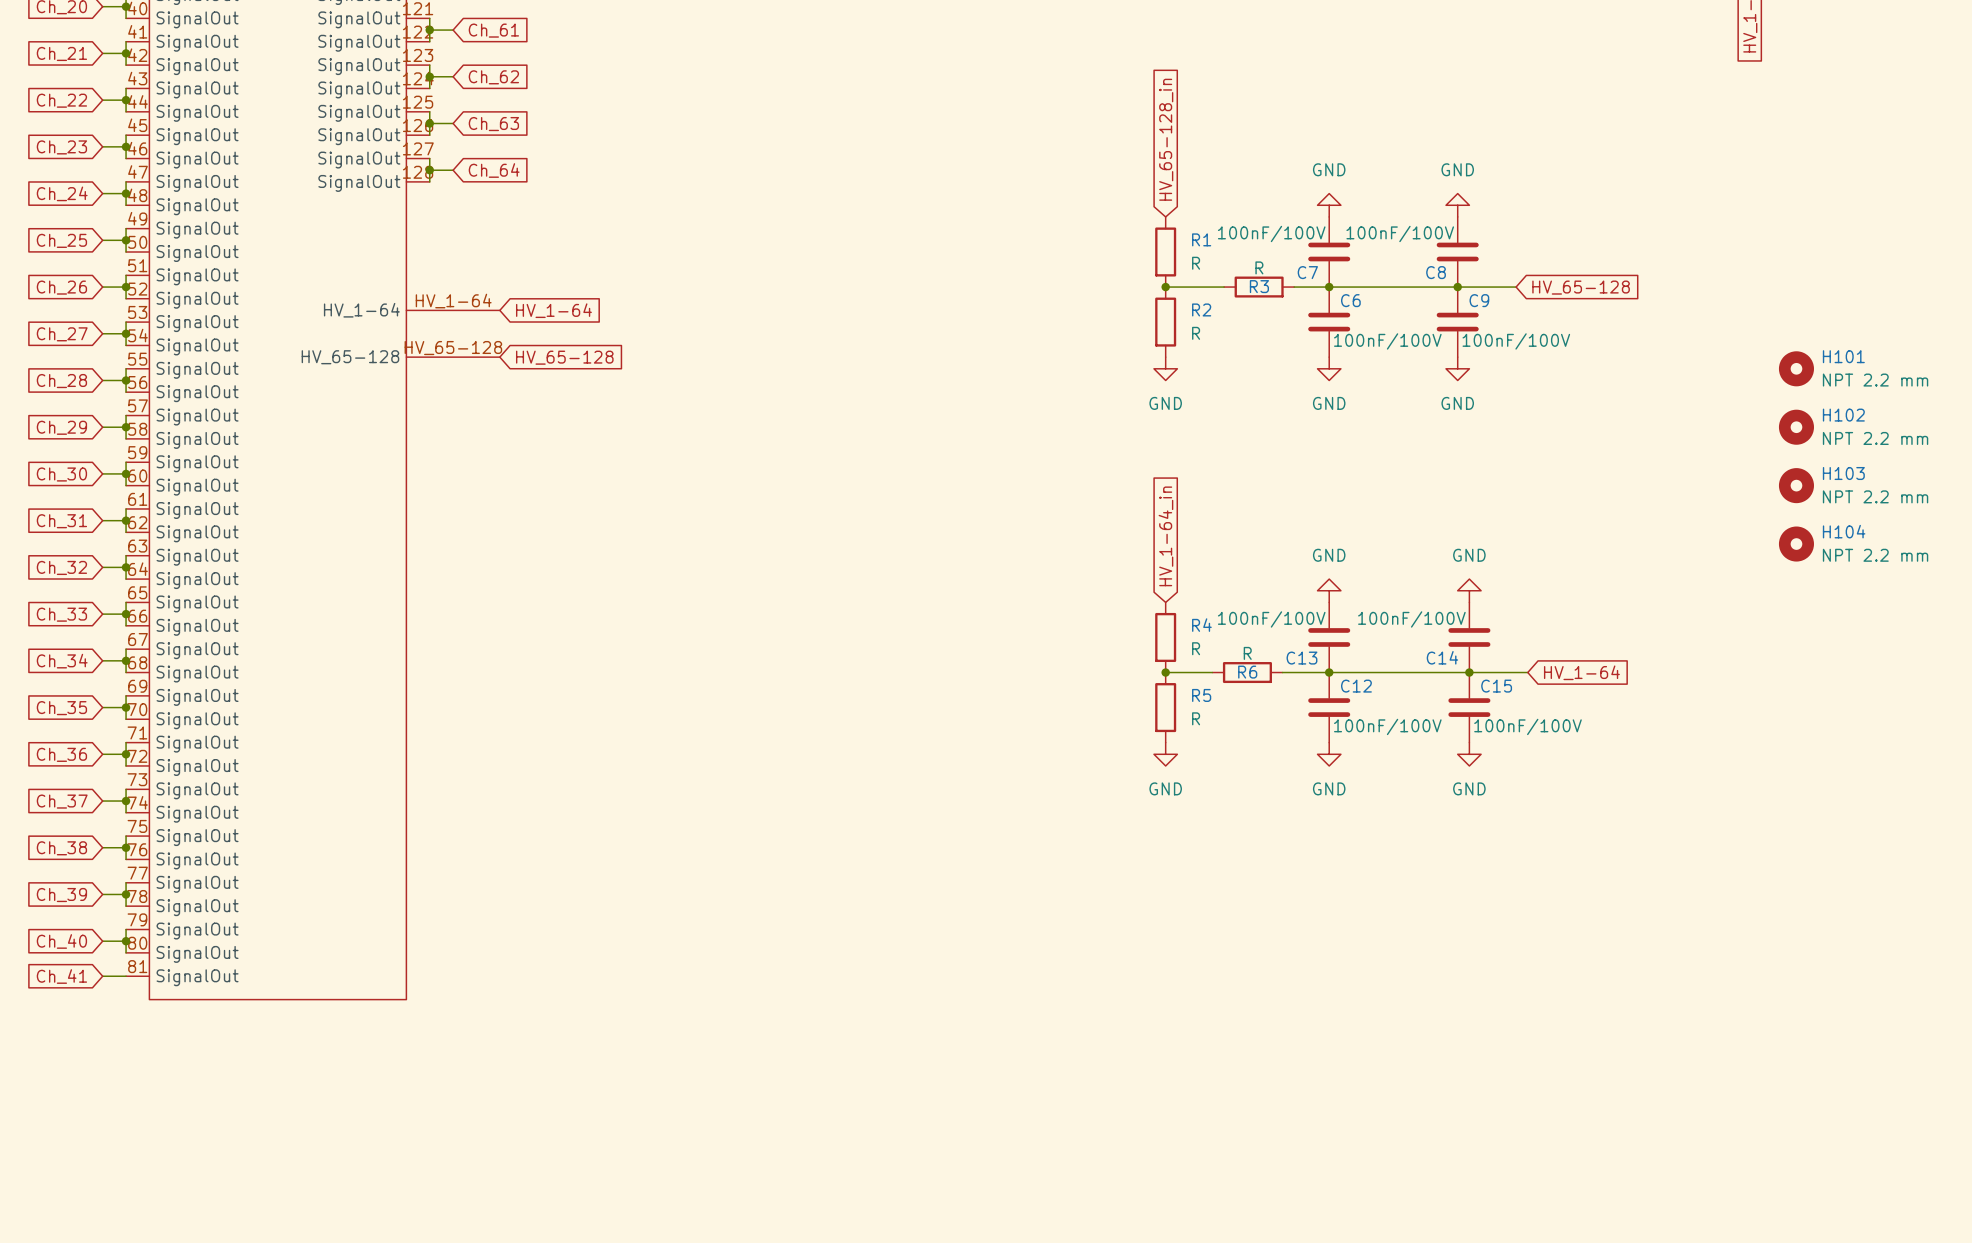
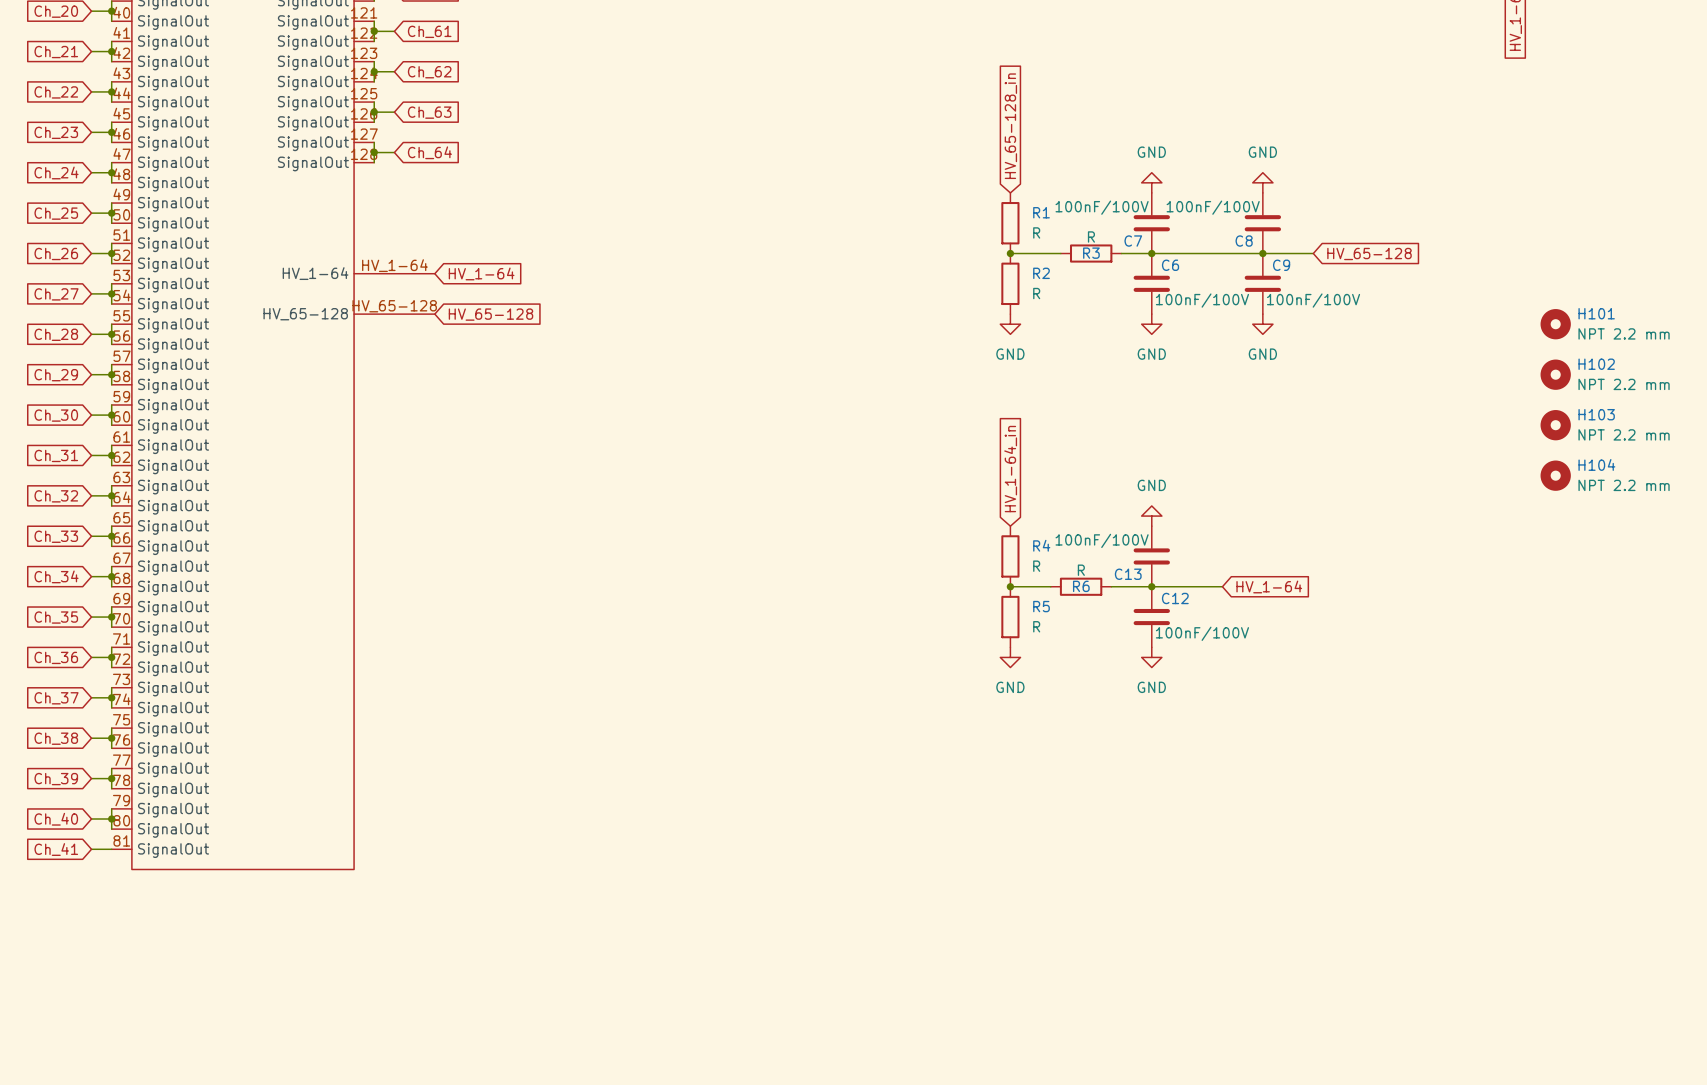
power symbol: GND (1469, 590) -> none
C14: 100nF/100V (1469, 637) -> none
wire: (1410, 672) (1527, 672) -> none
junction: (1469, 672) -> none
global label position: HV_1-64 (1581, 672) -> HV_1-64 (1269, 586)
C15: 100nF/100V (1469, 707) -> none
power symbol: GND (1469, 754) -> none

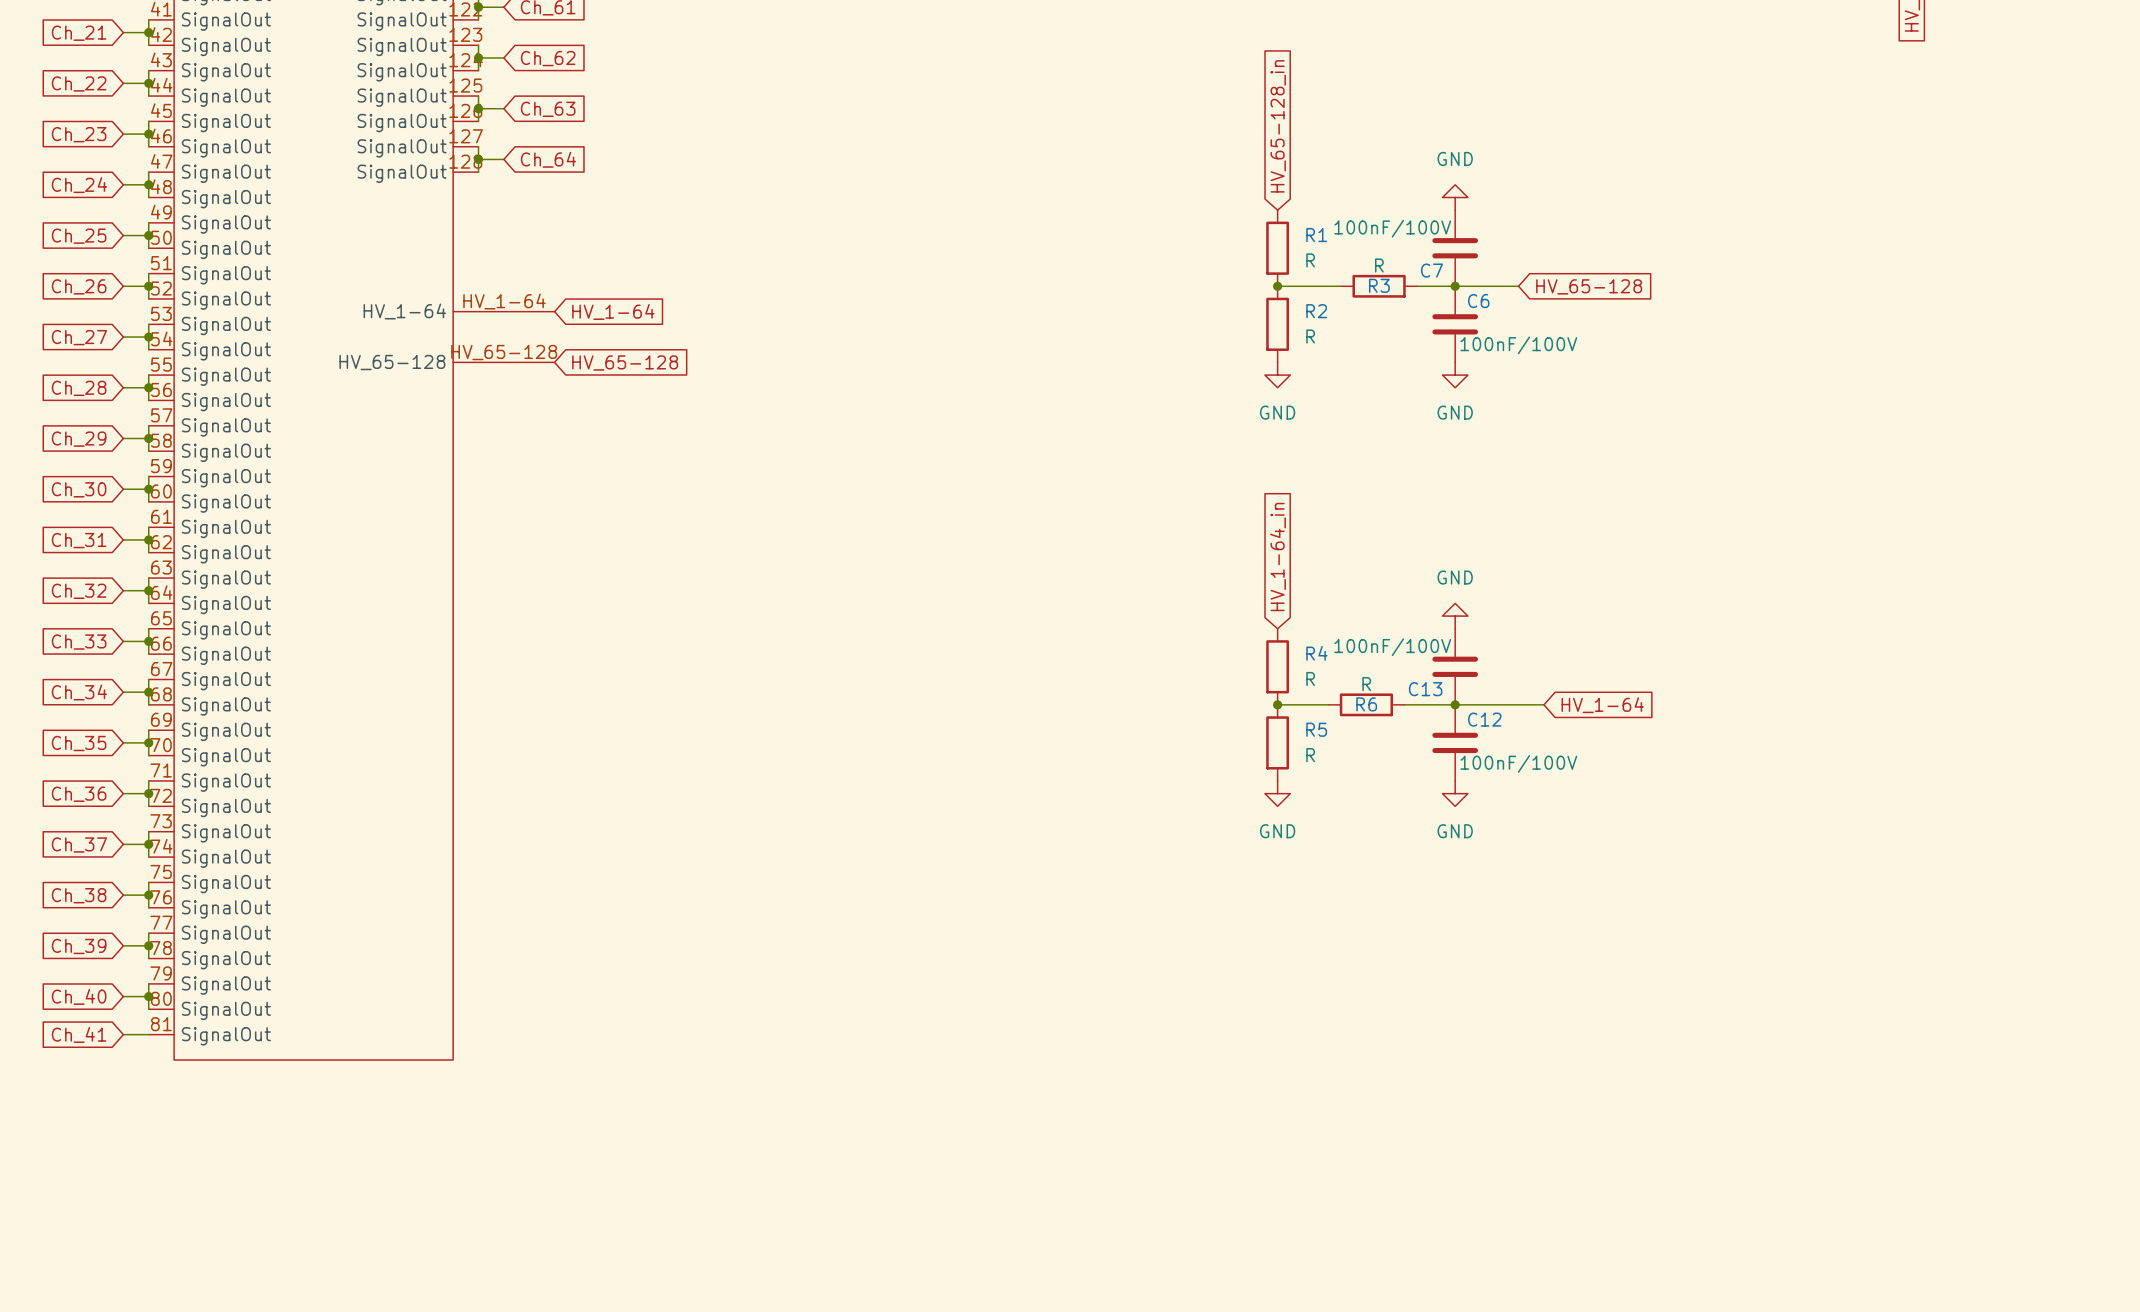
power symbol: GND (1262, 182) -> none
C8: 100nF/100V (1262, 223) -> none
wire: (1202, 253) (1313, 253) -> none
junction: (1262, 253) -> none
global label position: HV_65-128 (1369, 254) -> HV_65-128 (1589, 286)
C9: 100nF/100V (1262, 283) -> none
power symbol: GND (1262, 324) -> none
H101: NPT 2.2 mm (1555, 324) -> none
H102: NPT 2.2 mm (1555, 374) -> none
H103: NPT 2.2 mm (1555, 425) -> none
H104: NPT 2.2 mm (1555, 475) -> none

